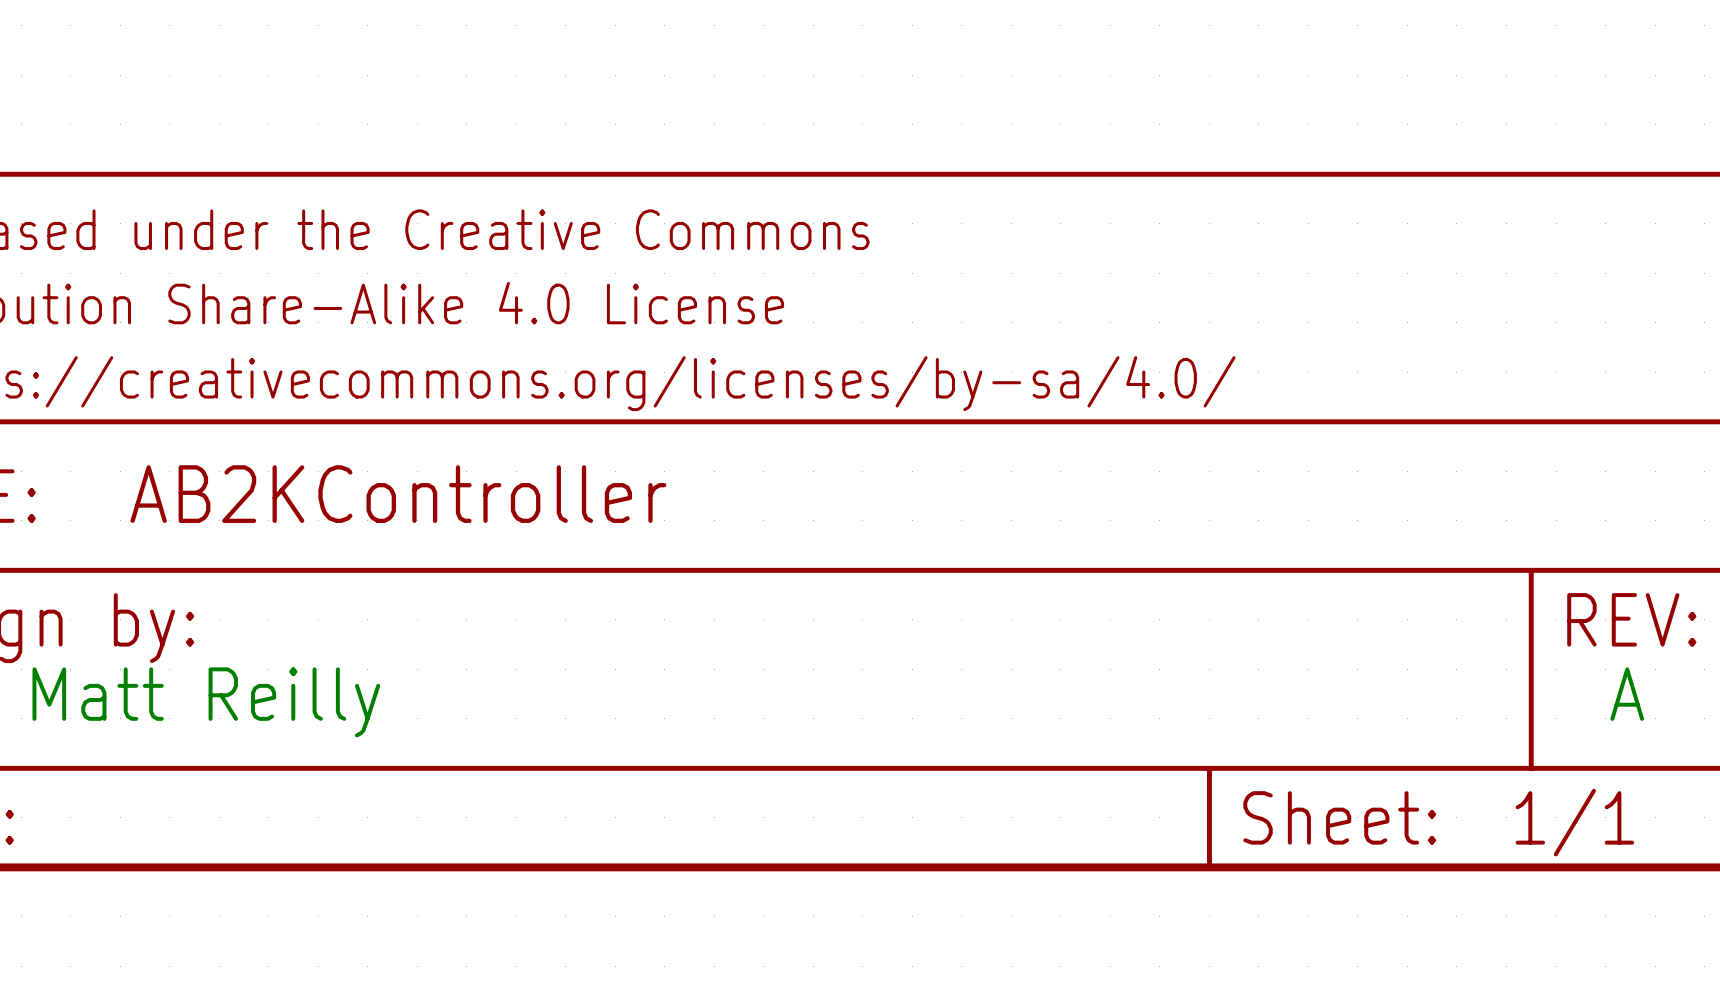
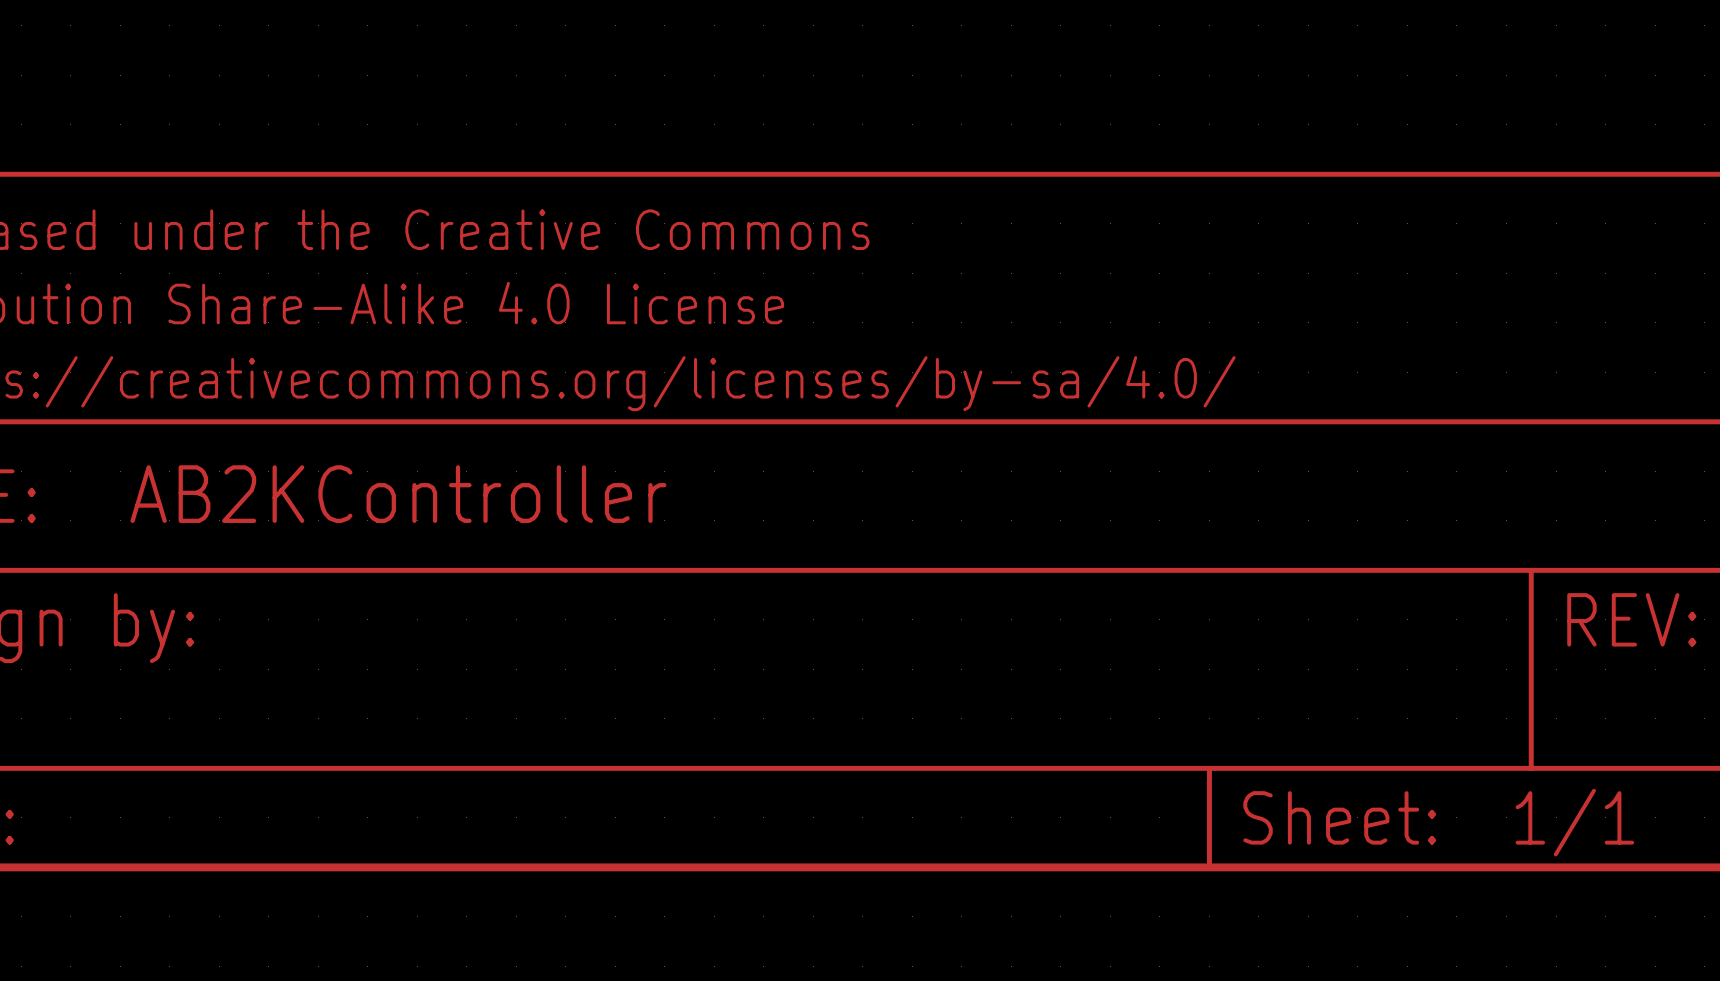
text: A (1627, 694) -> none
text: Matt Reilly (206, 702) -> none

